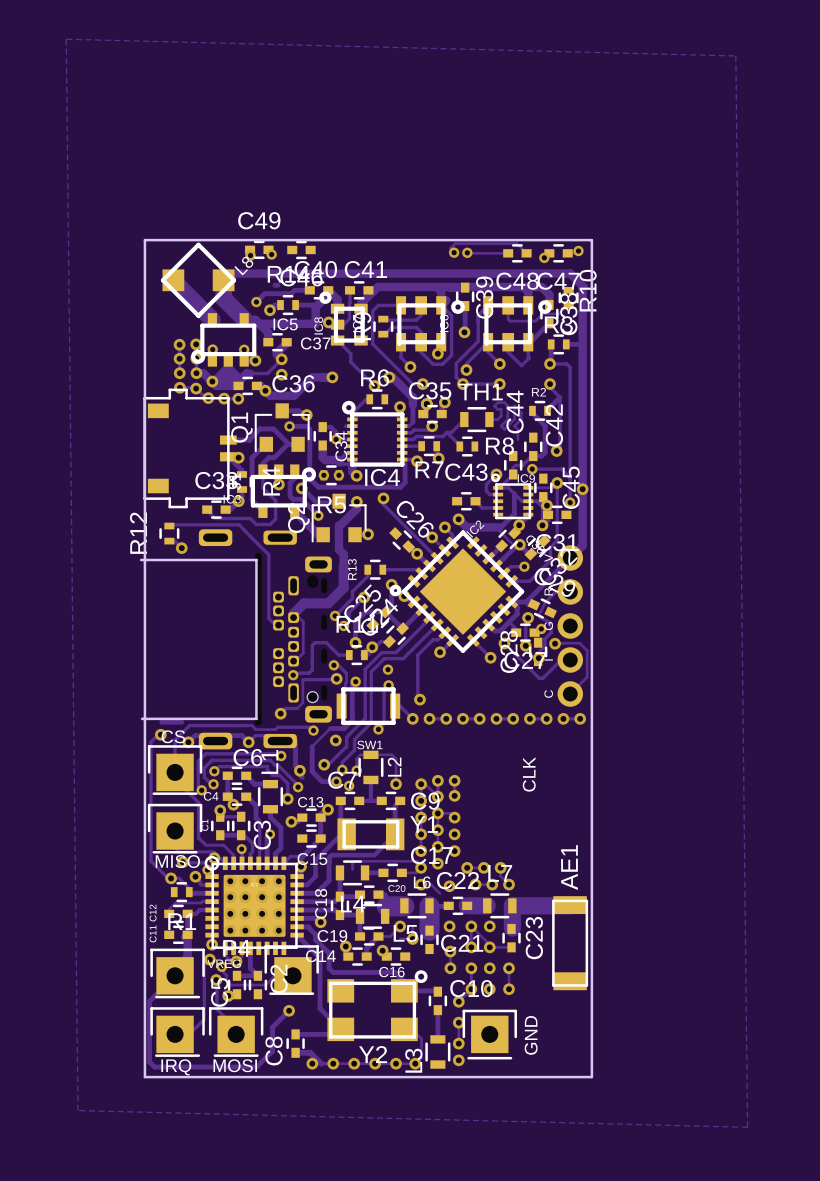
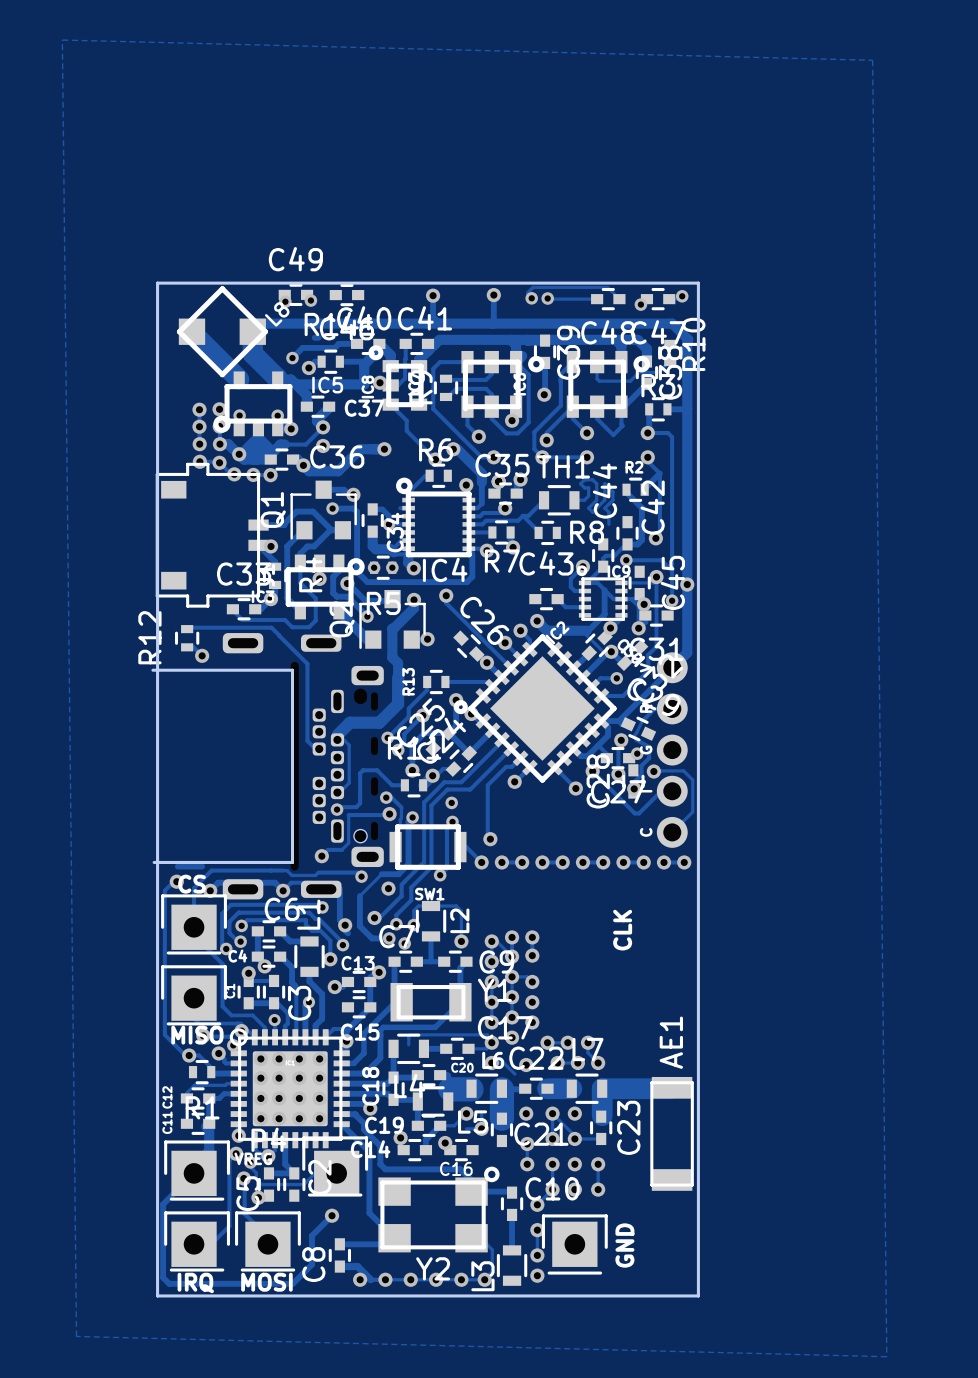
track: none -> (493, 295) (492, 323)
via: none -> (493, 295)
track: none -> (433, 295) (433, 316) (439, 323)
via: none -> (433, 295)

